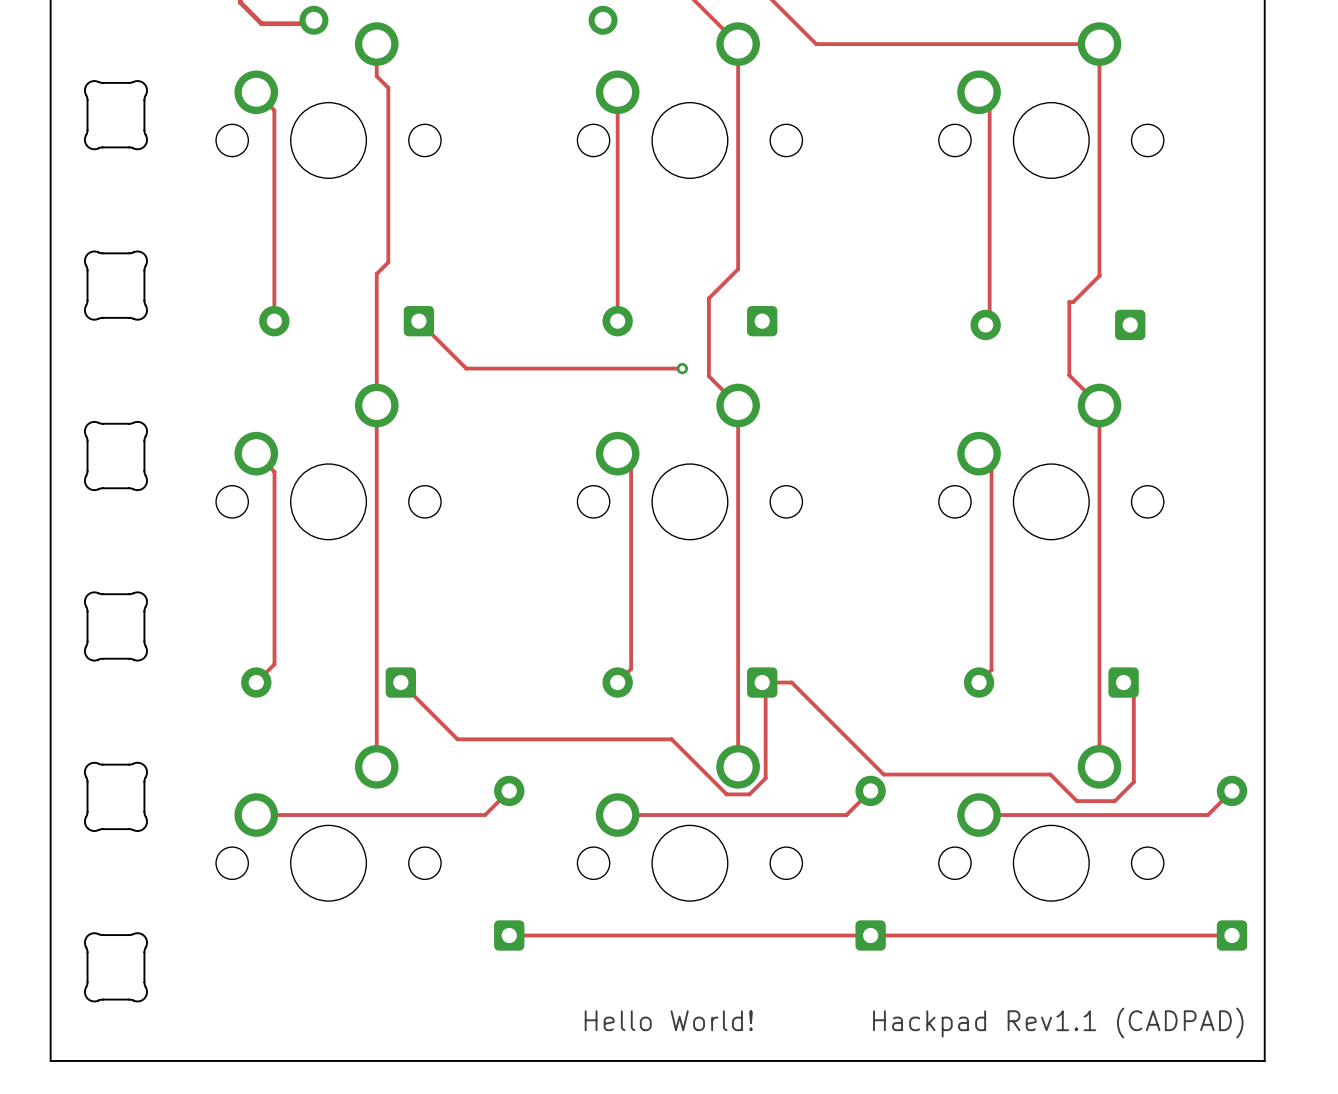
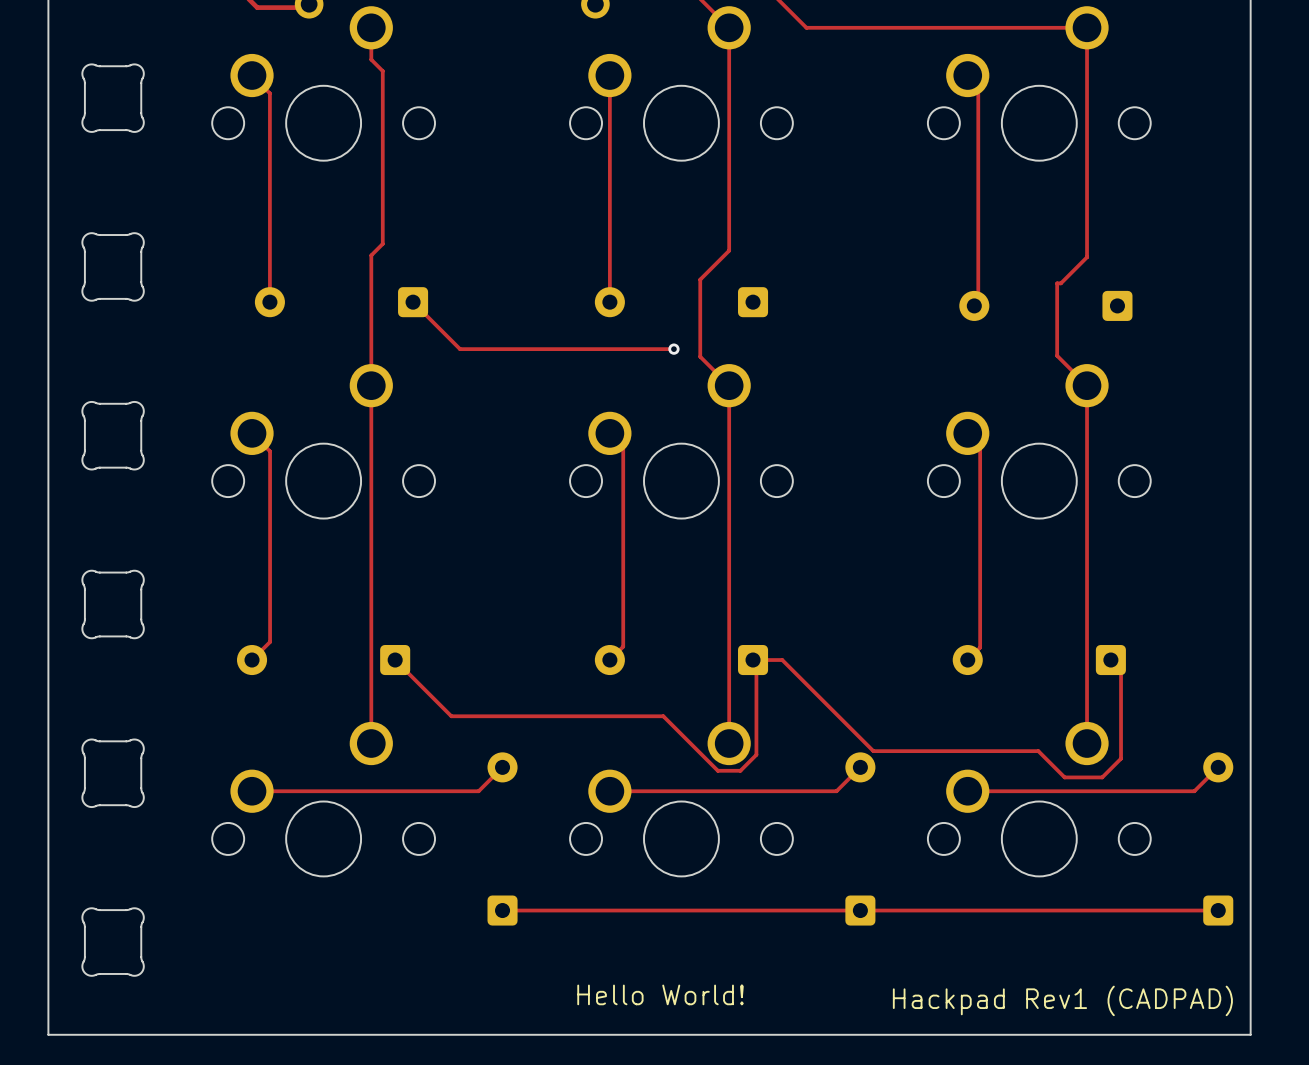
text: Hackpad Rev1.1 (CADPAD) (1058, 1022) -> Hackpad Rev1 (CADPAD) (1062, 1000)

